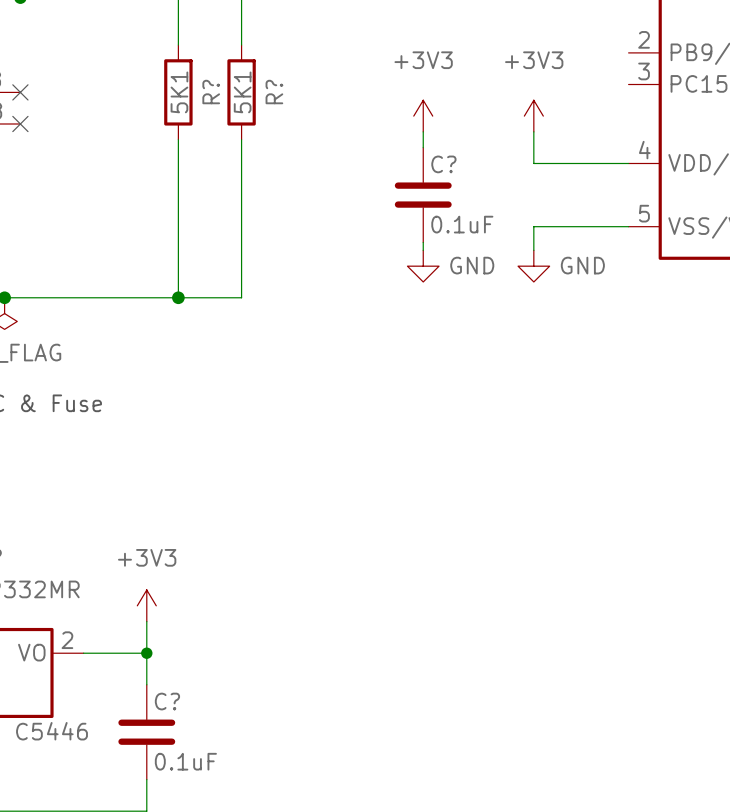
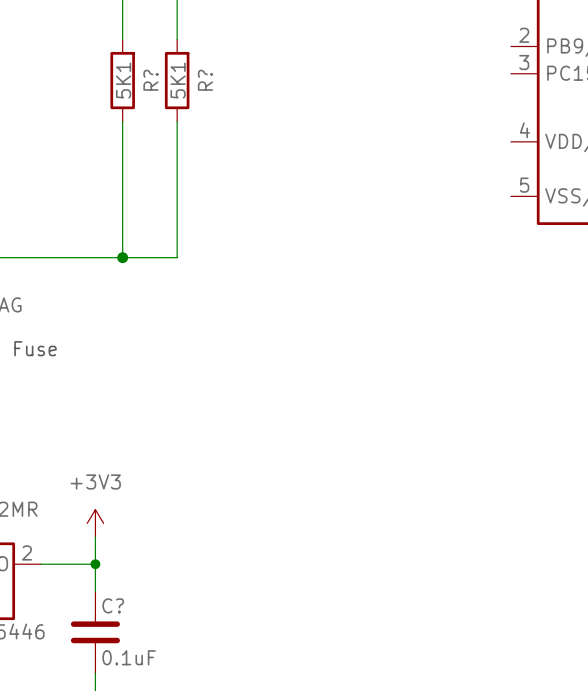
power symbol: +3V3 (423, 116) -> none
power symbol: +3V3 (533, 116) -> none
wire: (423, 131) (423, 147) -> none
wire: (533, 131) (533, 163) (628, 163) -> none
C?: 0.1uF (423, 195) -> none
wire: (628, 226) (533, 226) (533, 250) -> none
wire: (423, 242) (423, 250) -> none
power symbol: GND (423, 266) -> none
power symbol: GND (533, 266) -> none

